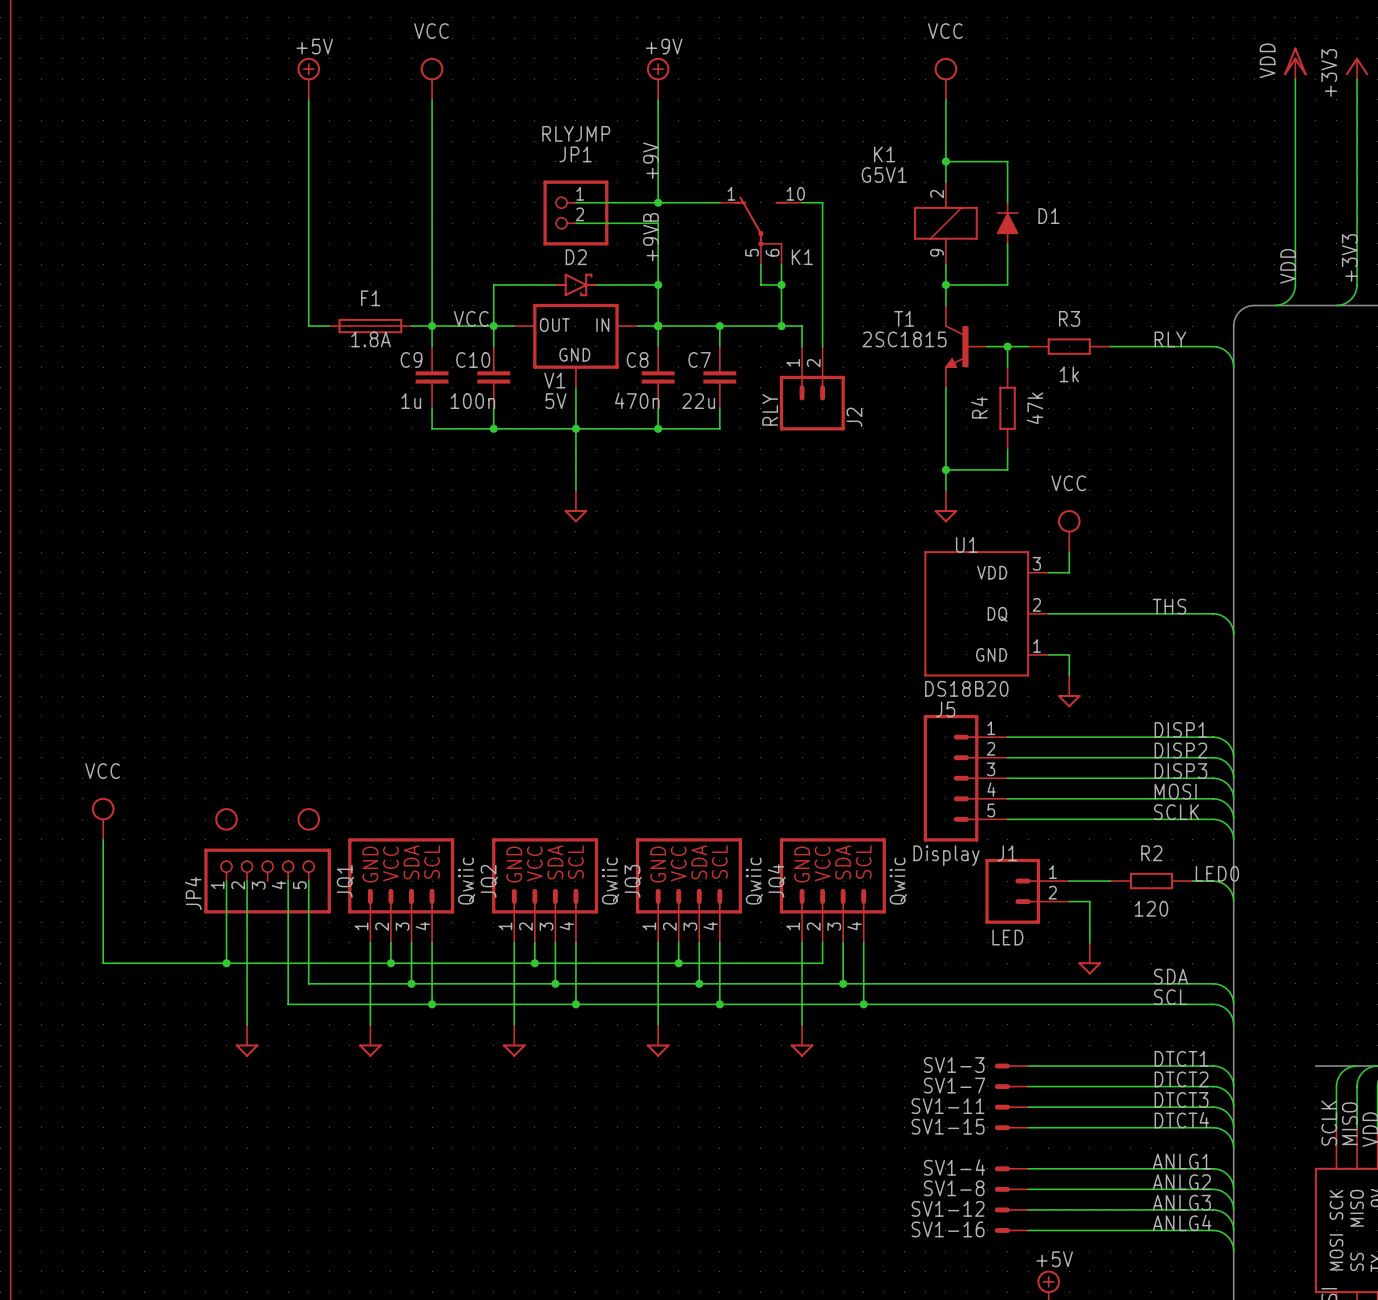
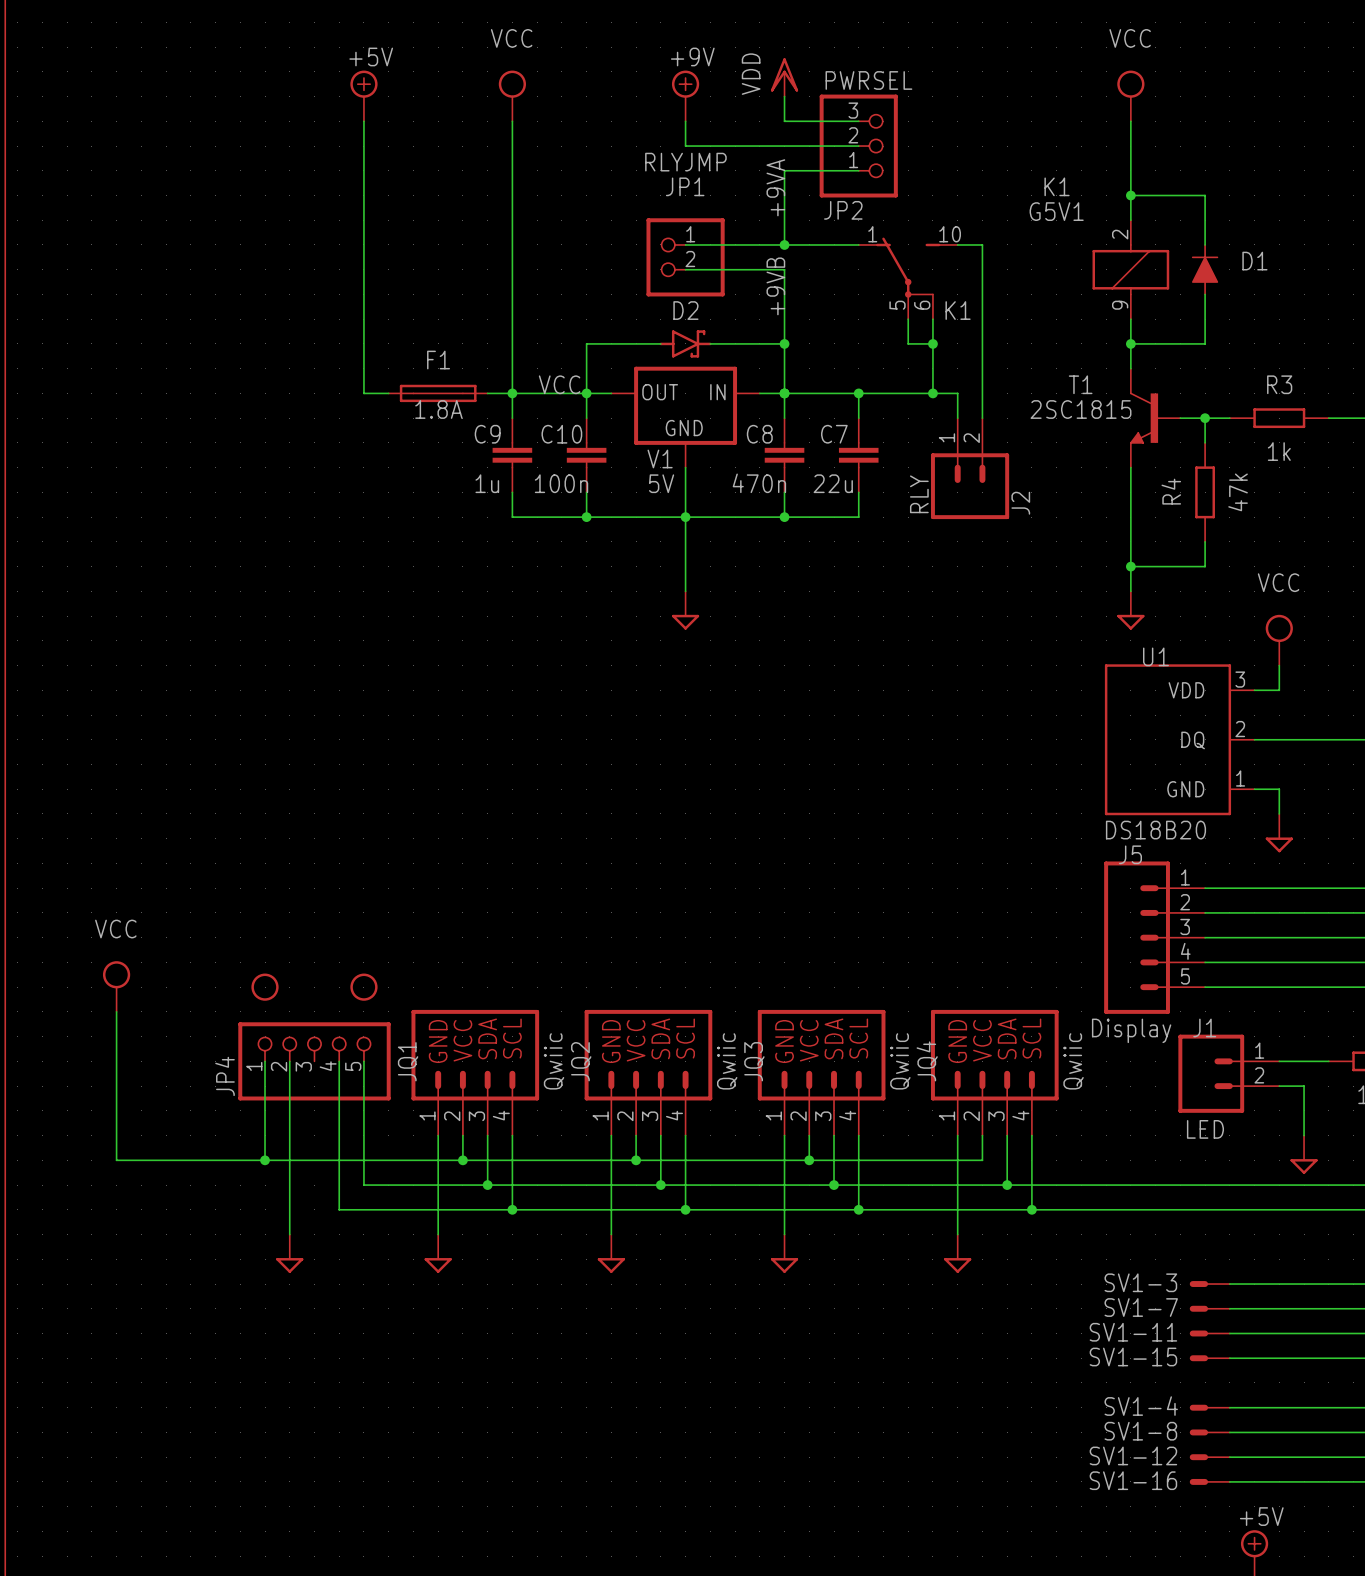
power symbol: none -> VDD (784, 77)
power symbol position: +9V (658, 78) -> +9V (685, 95)
wire: none -> (784, 96) (784, 121) (858, 121)
wire: none -> (685, 121) (685, 146) (858, 146)
wire: (658, 99) (658, 141) -> (858, 170) (784, 170)
JP2: none -> PWRSEL (858, 146)
label: +9V (650, 160) -> +9VA (775, 187)

